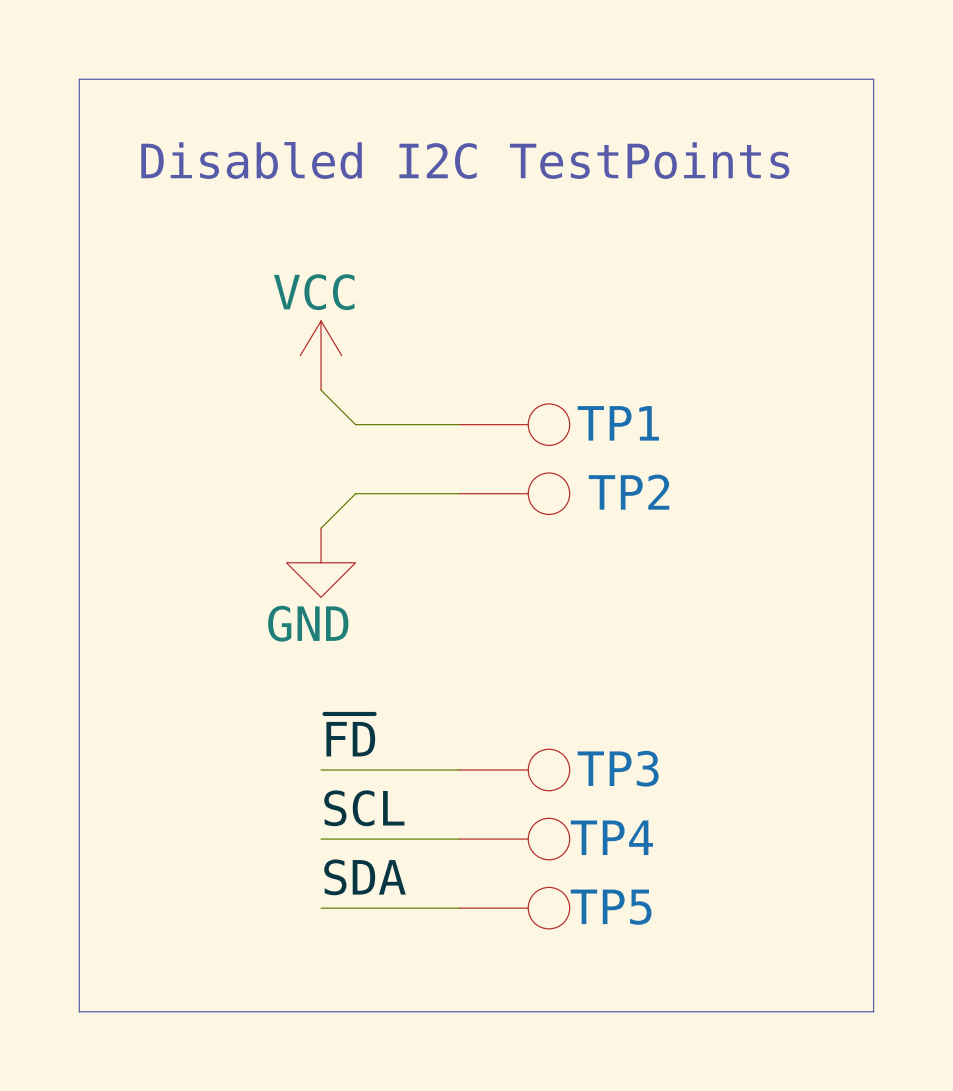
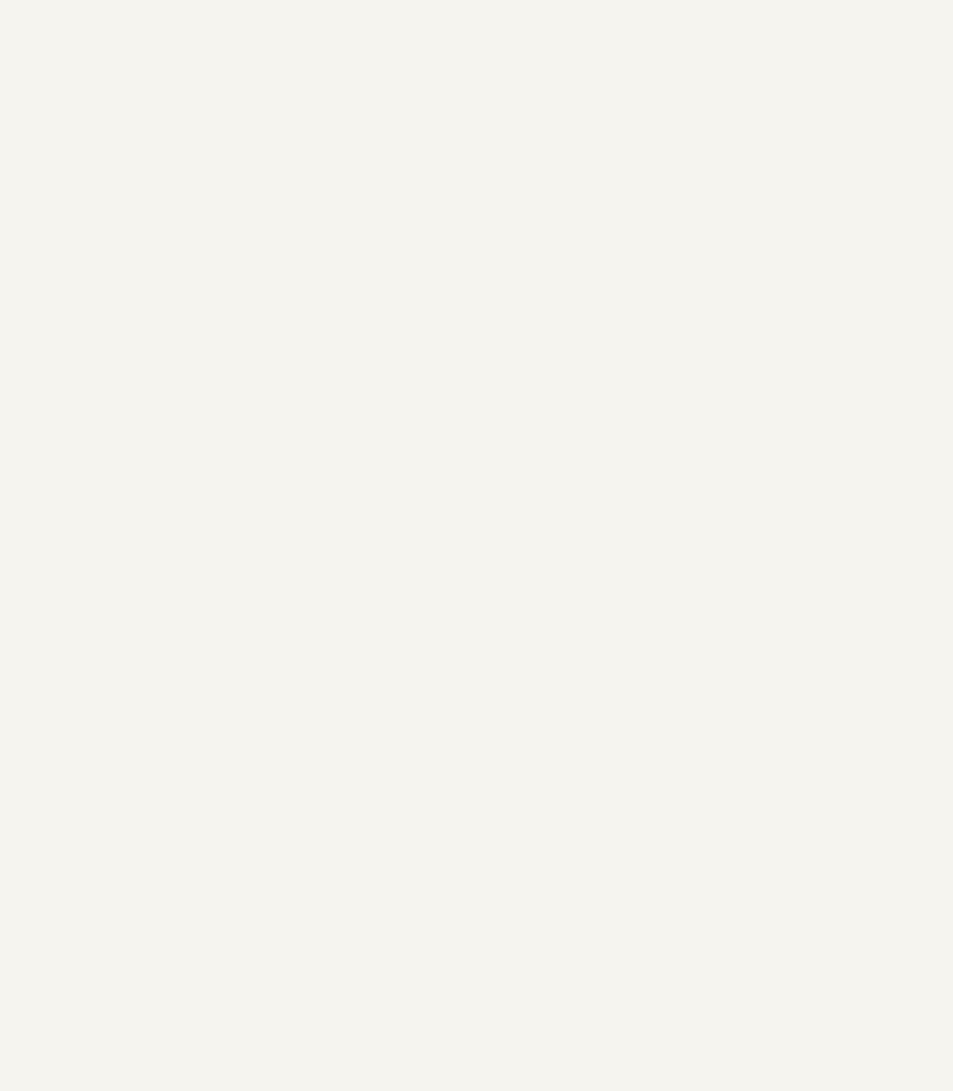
line: (79, 79) (873, 79) (873, 1011) (79, 1011) (79, 79) -> none
text: Disabled I2C TestPoints (465, 160) -> none
power symbol: VCC (321, 355) -> none
wire: (321, 390) (355, 424) (459, 424) -> none
TP1: (514, 424) -> none
wire: (459, 493) (355, 493) (321, 528) -> none
TP2: (514, 493) -> none
power symbol: GND (321, 562) -> none
label: ~{FD} (349, 735) -> none
wire: (321, 770) (459, 770) -> none
TP3: (514, 770) -> none
label: SCL (364, 808) -> none
wire: (321, 839) (459, 839) -> none
TP4: (514, 839) -> none
label: SDA (365, 877) -> none
wire: (321, 908) (459, 908) -> none
TP5: (514, 908) -> none

